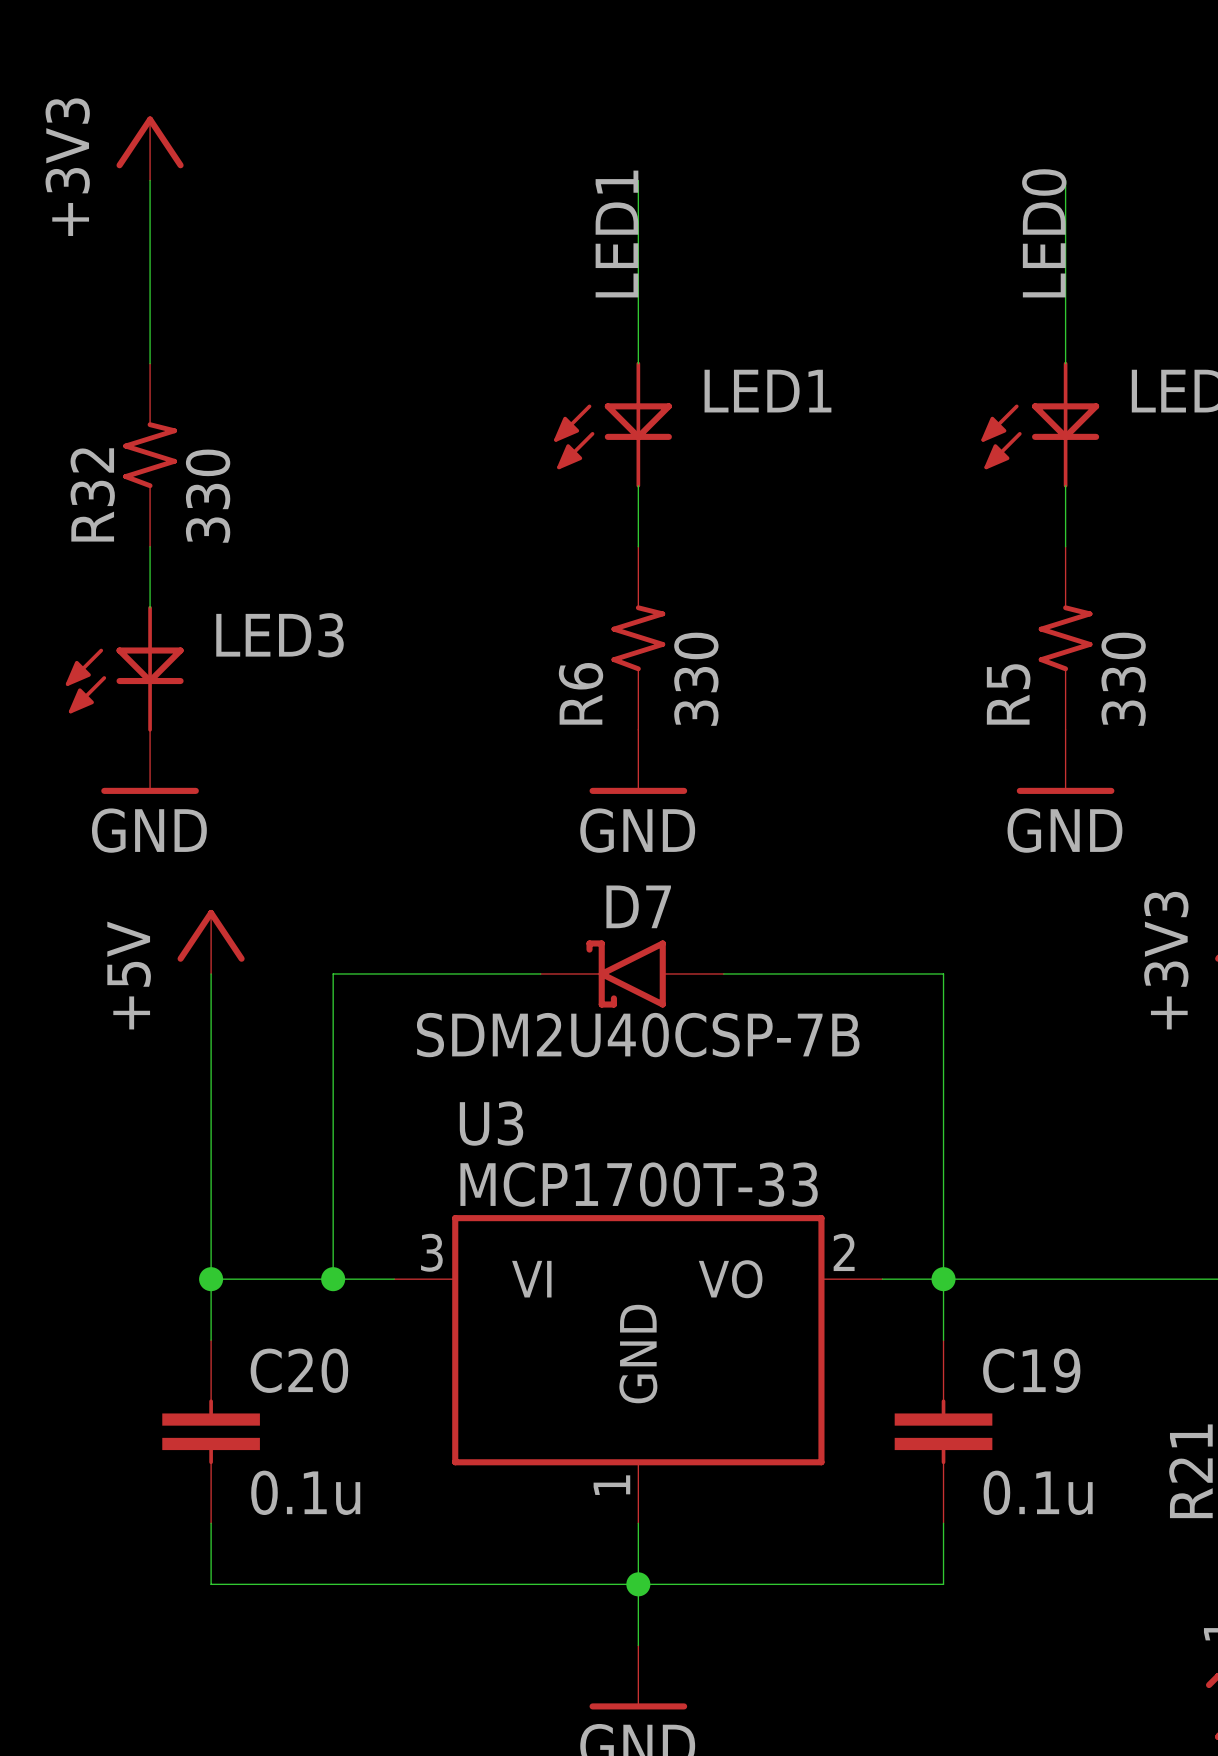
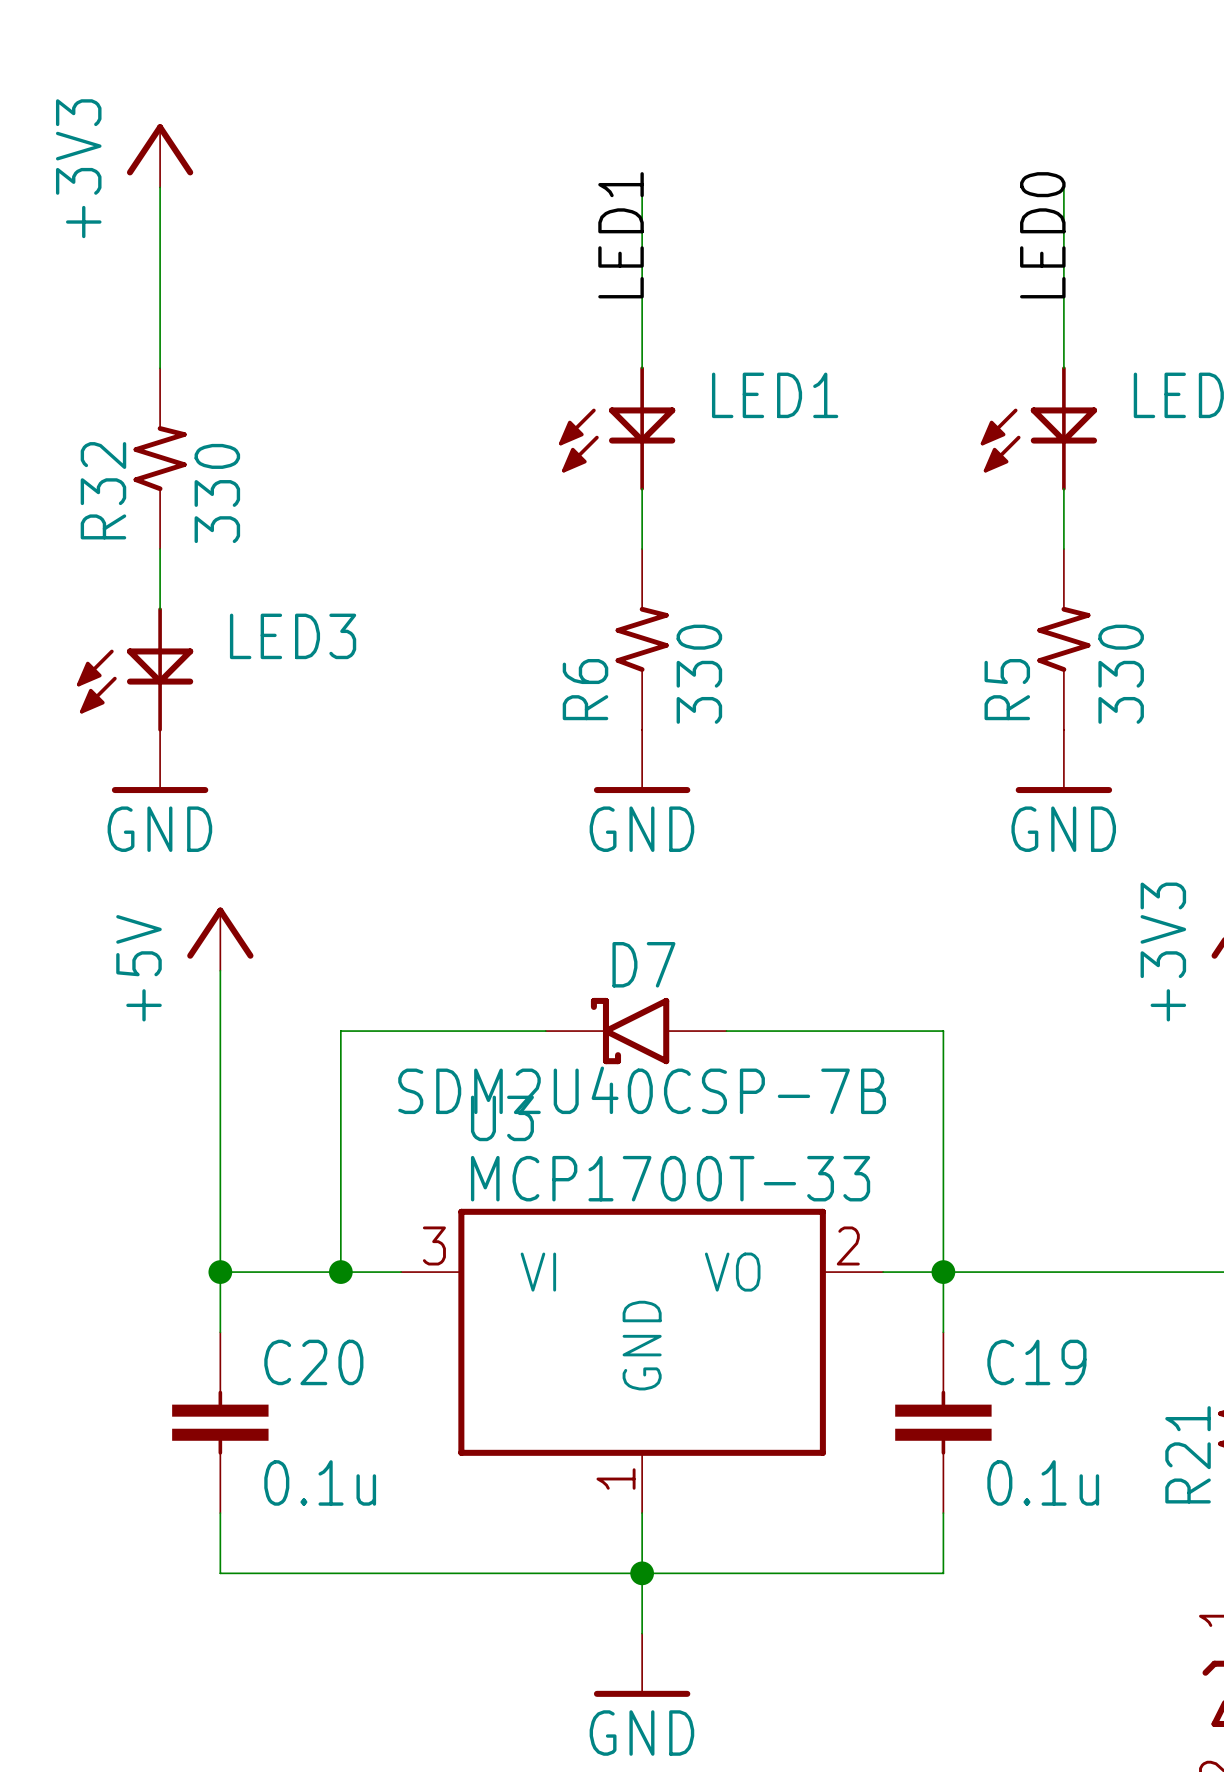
wire: (540, 973) (333, 973) (333, 1035) -> (545, 1031) (340, 1031)
D7 position: (632, 973) -> (636, 1031)
wire: (723, 973) (943, 973) (943, 1035) -> (726, 1031) (943, 1031)

